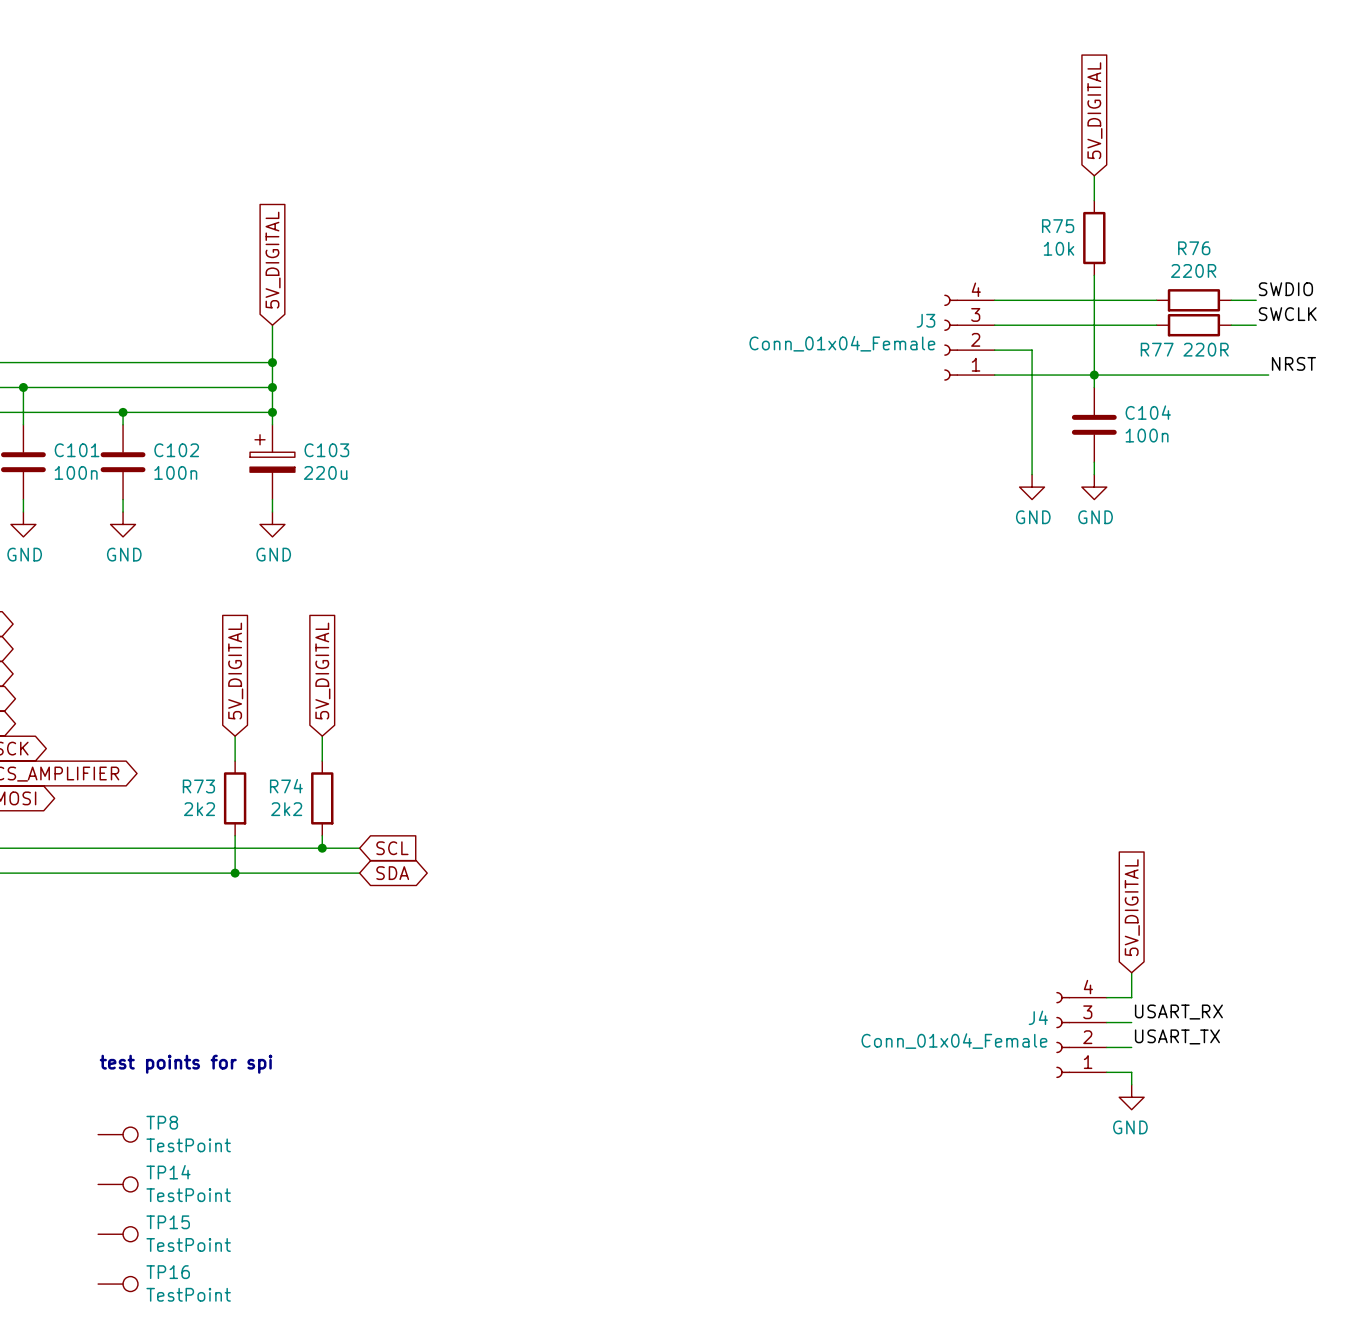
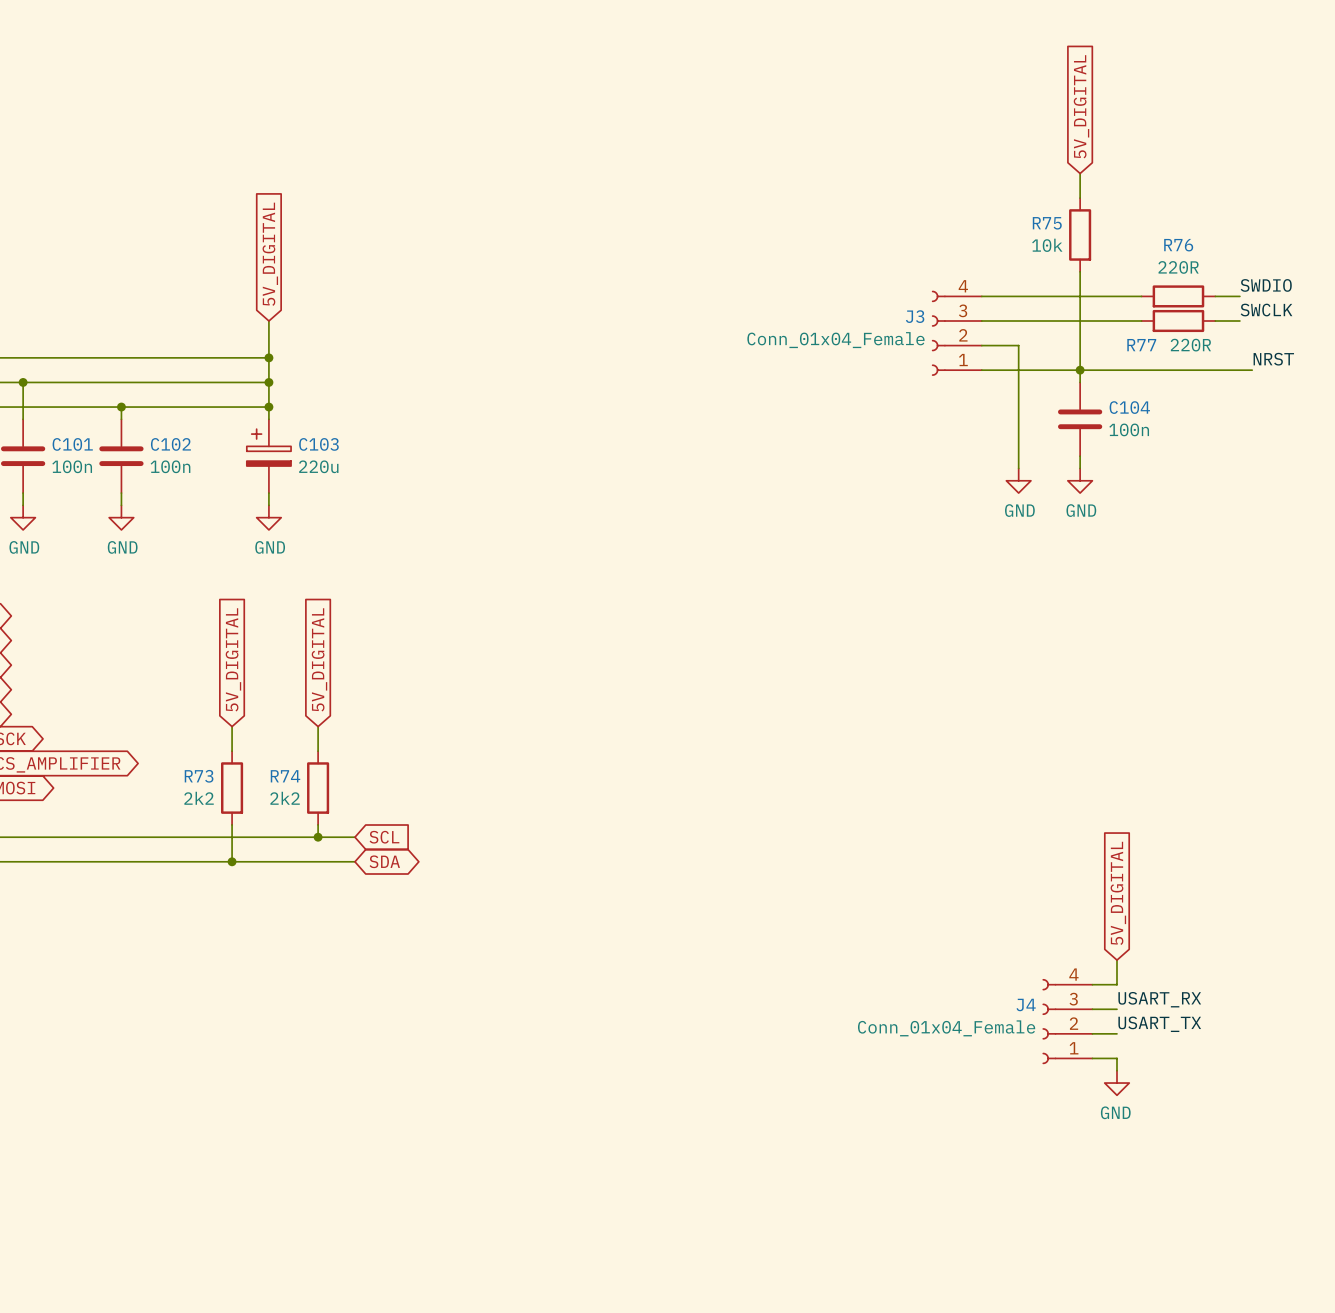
text: test points for spi (186, 1064) -> none
TP8: TestPoint (118, 1134) -> none
TP14: TestPoint (118, 1184) -> none
TP15: TestPoint (118, 1234) -> none
TP16: TestPoint (118, 1284) -> none

